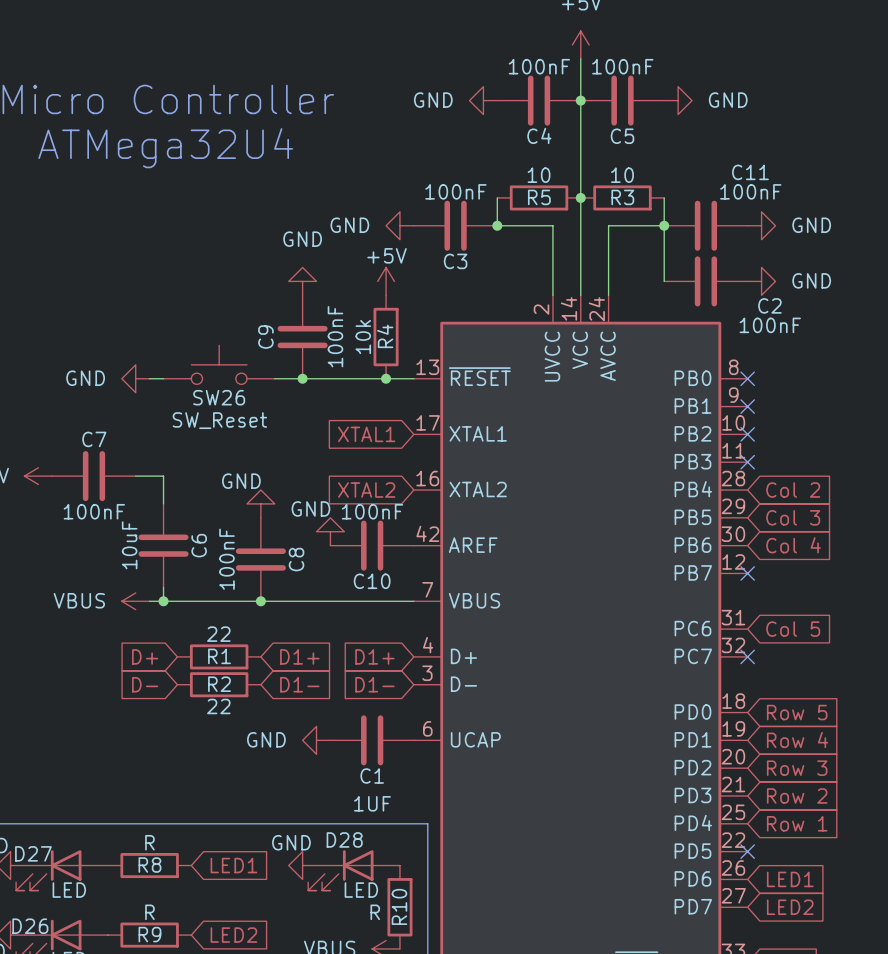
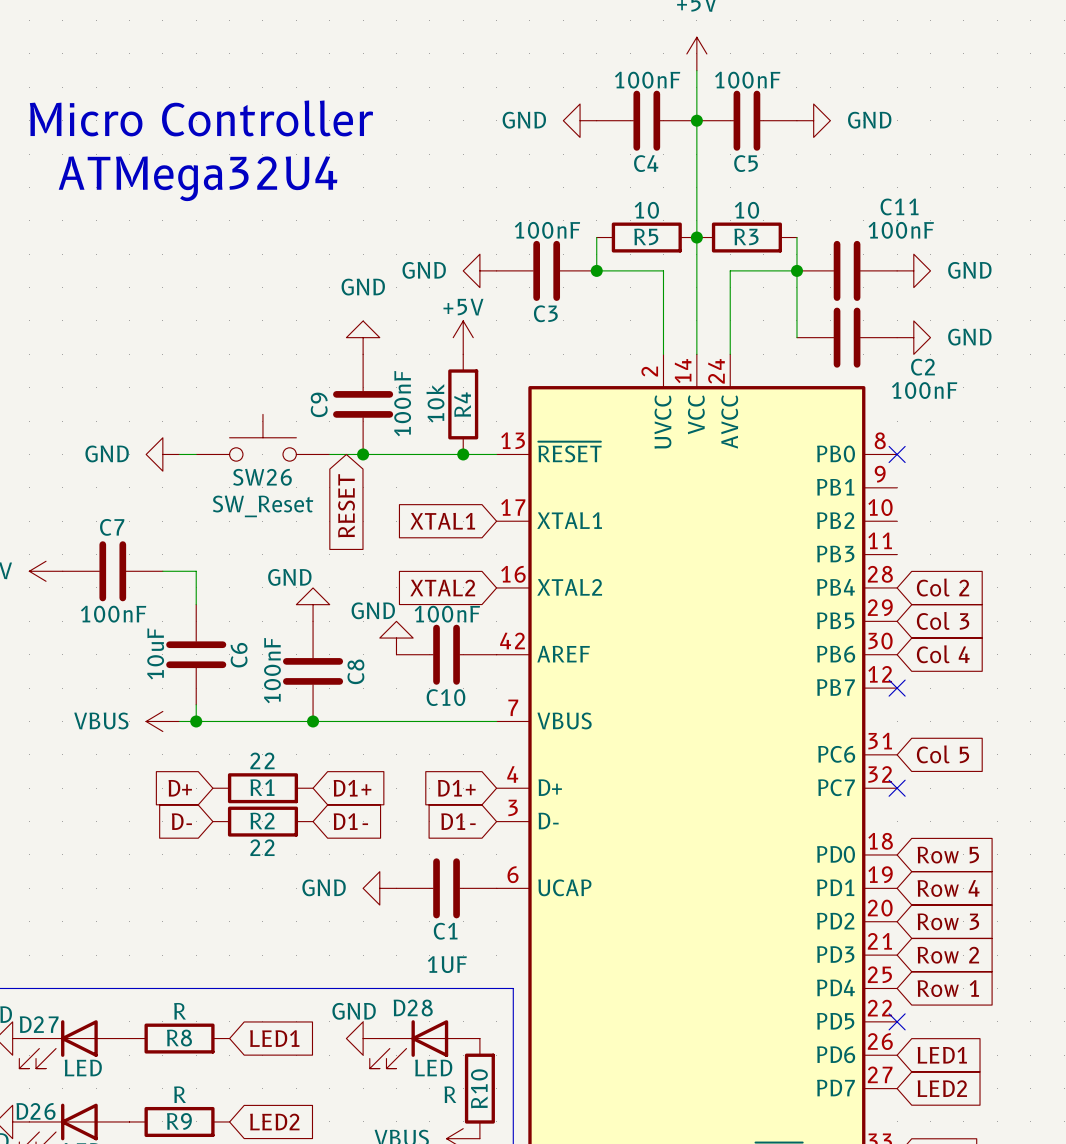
no-connect mark: (747, 406) -> none
global label: none -> RESET (346, 505)
no-connect mark: (747, 434) -> none
no-connect mark: (747, 462) -> none

